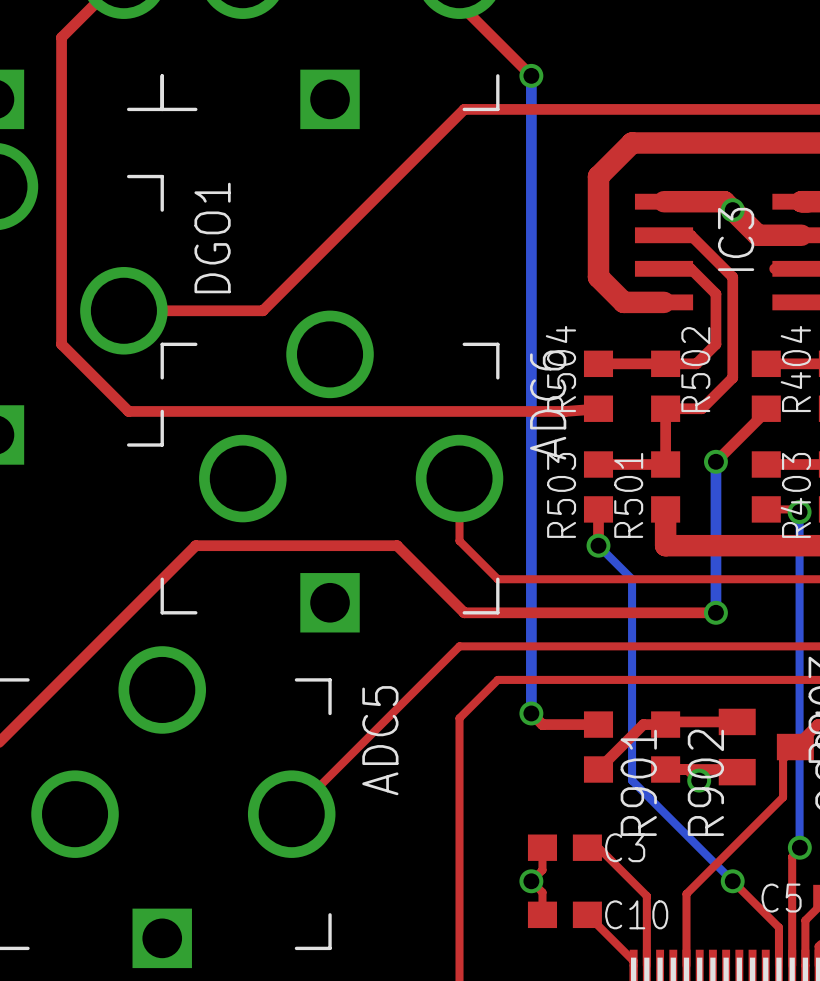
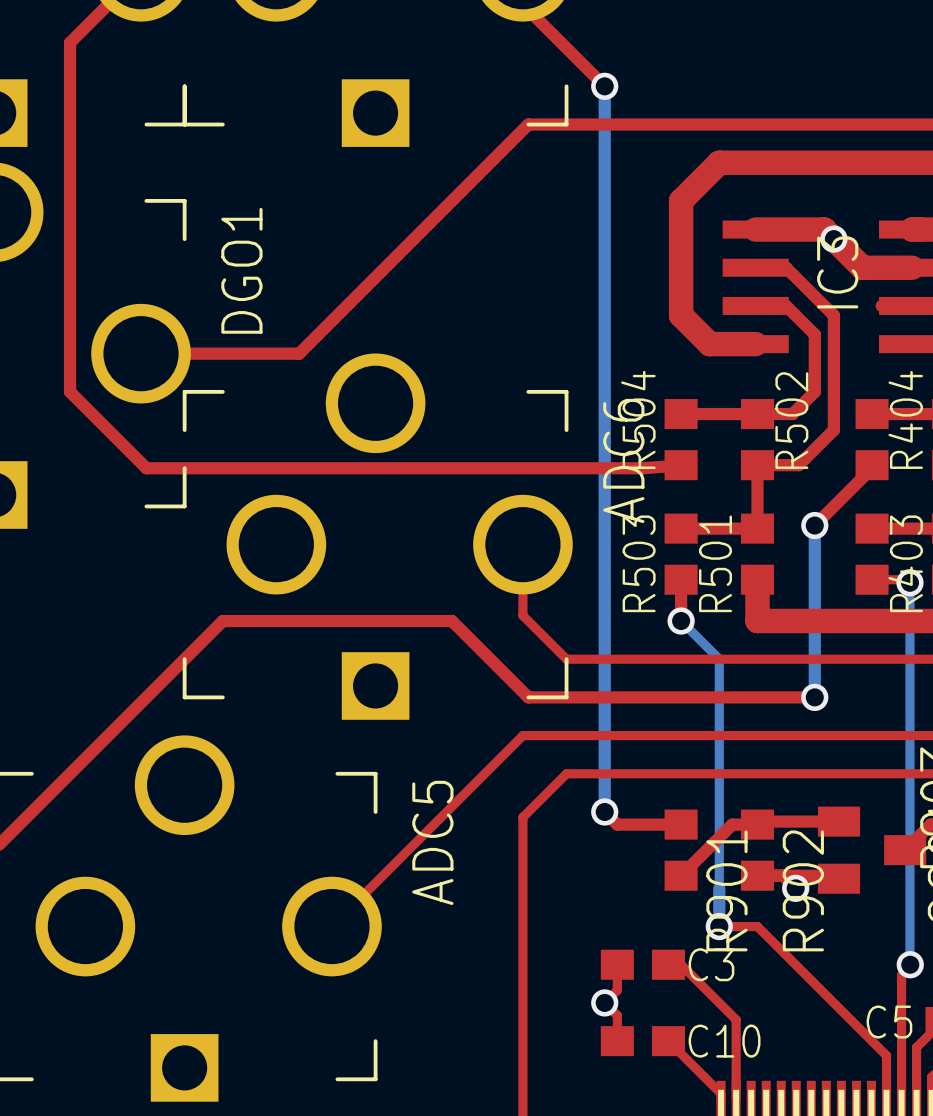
top track: (795, 747) (783, 759) (783, 797) (686, 893) (686, 965) -> none
bottom track: (632, 780) (732, 881) -> (719, 888) (719, 926)
top track: none -> (719, 926) (757, 926) (833, 1002)
via: none -> (719, 926)
via: (732, 881) -> none

